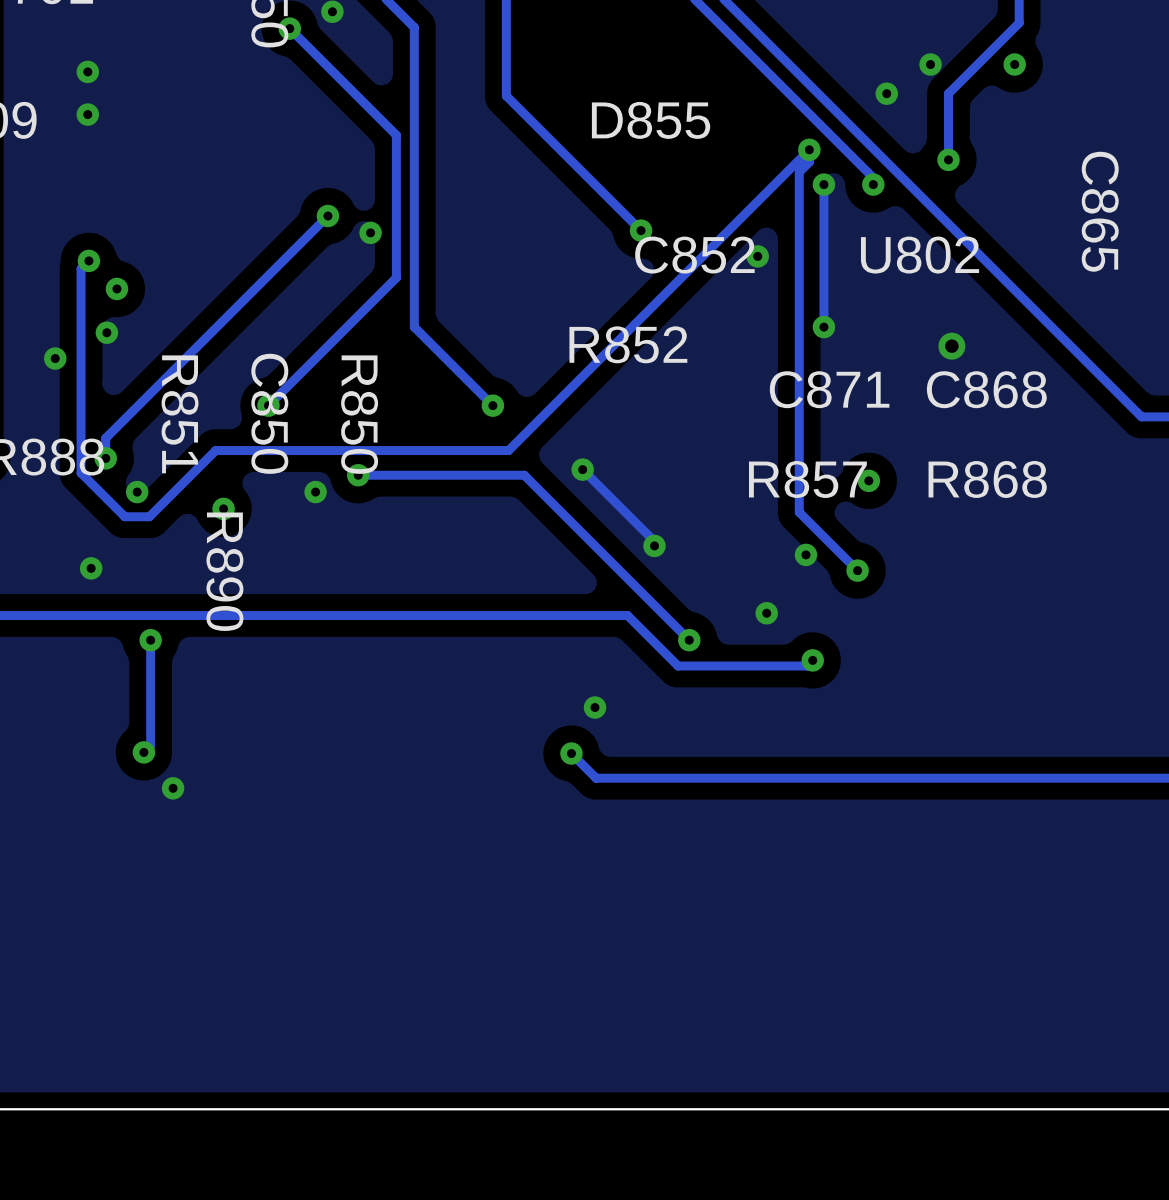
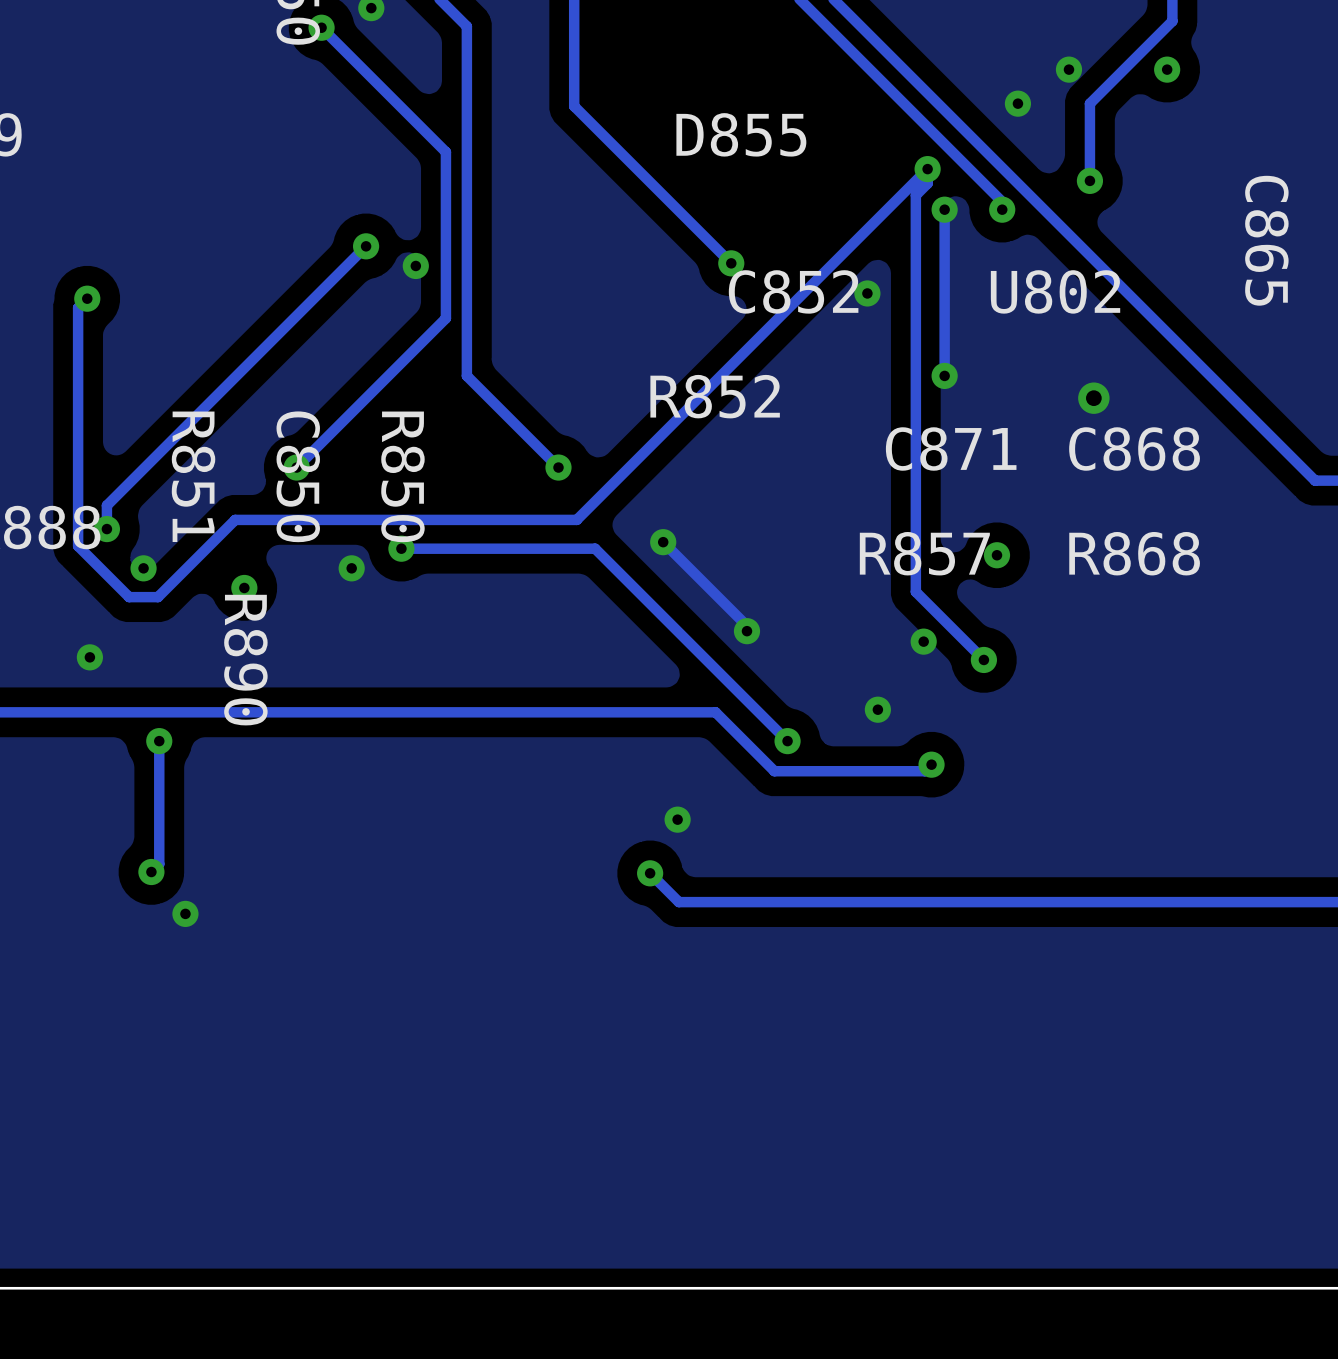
via: (87, 71) -> none
via: (87, 114) -> none
via: (116, 288) -> none
via: (106, 332) -> none
via: (55, 358) -> none

